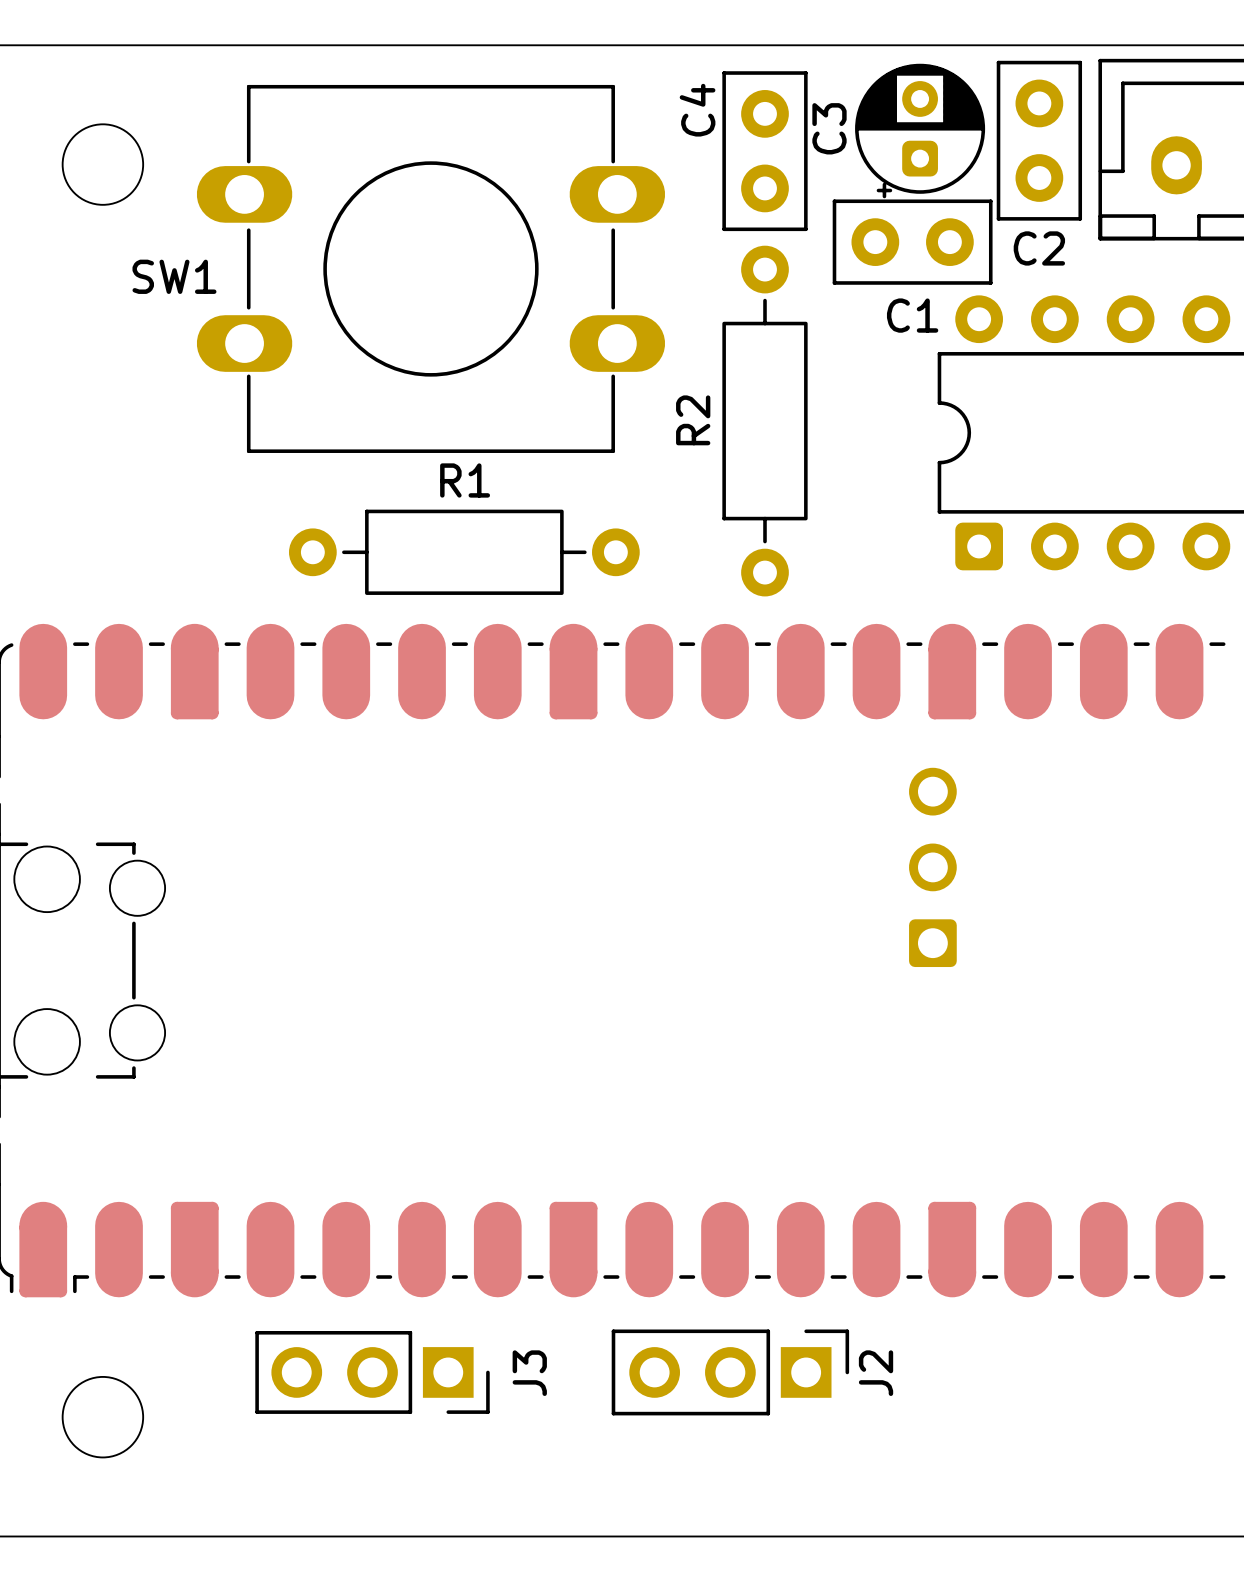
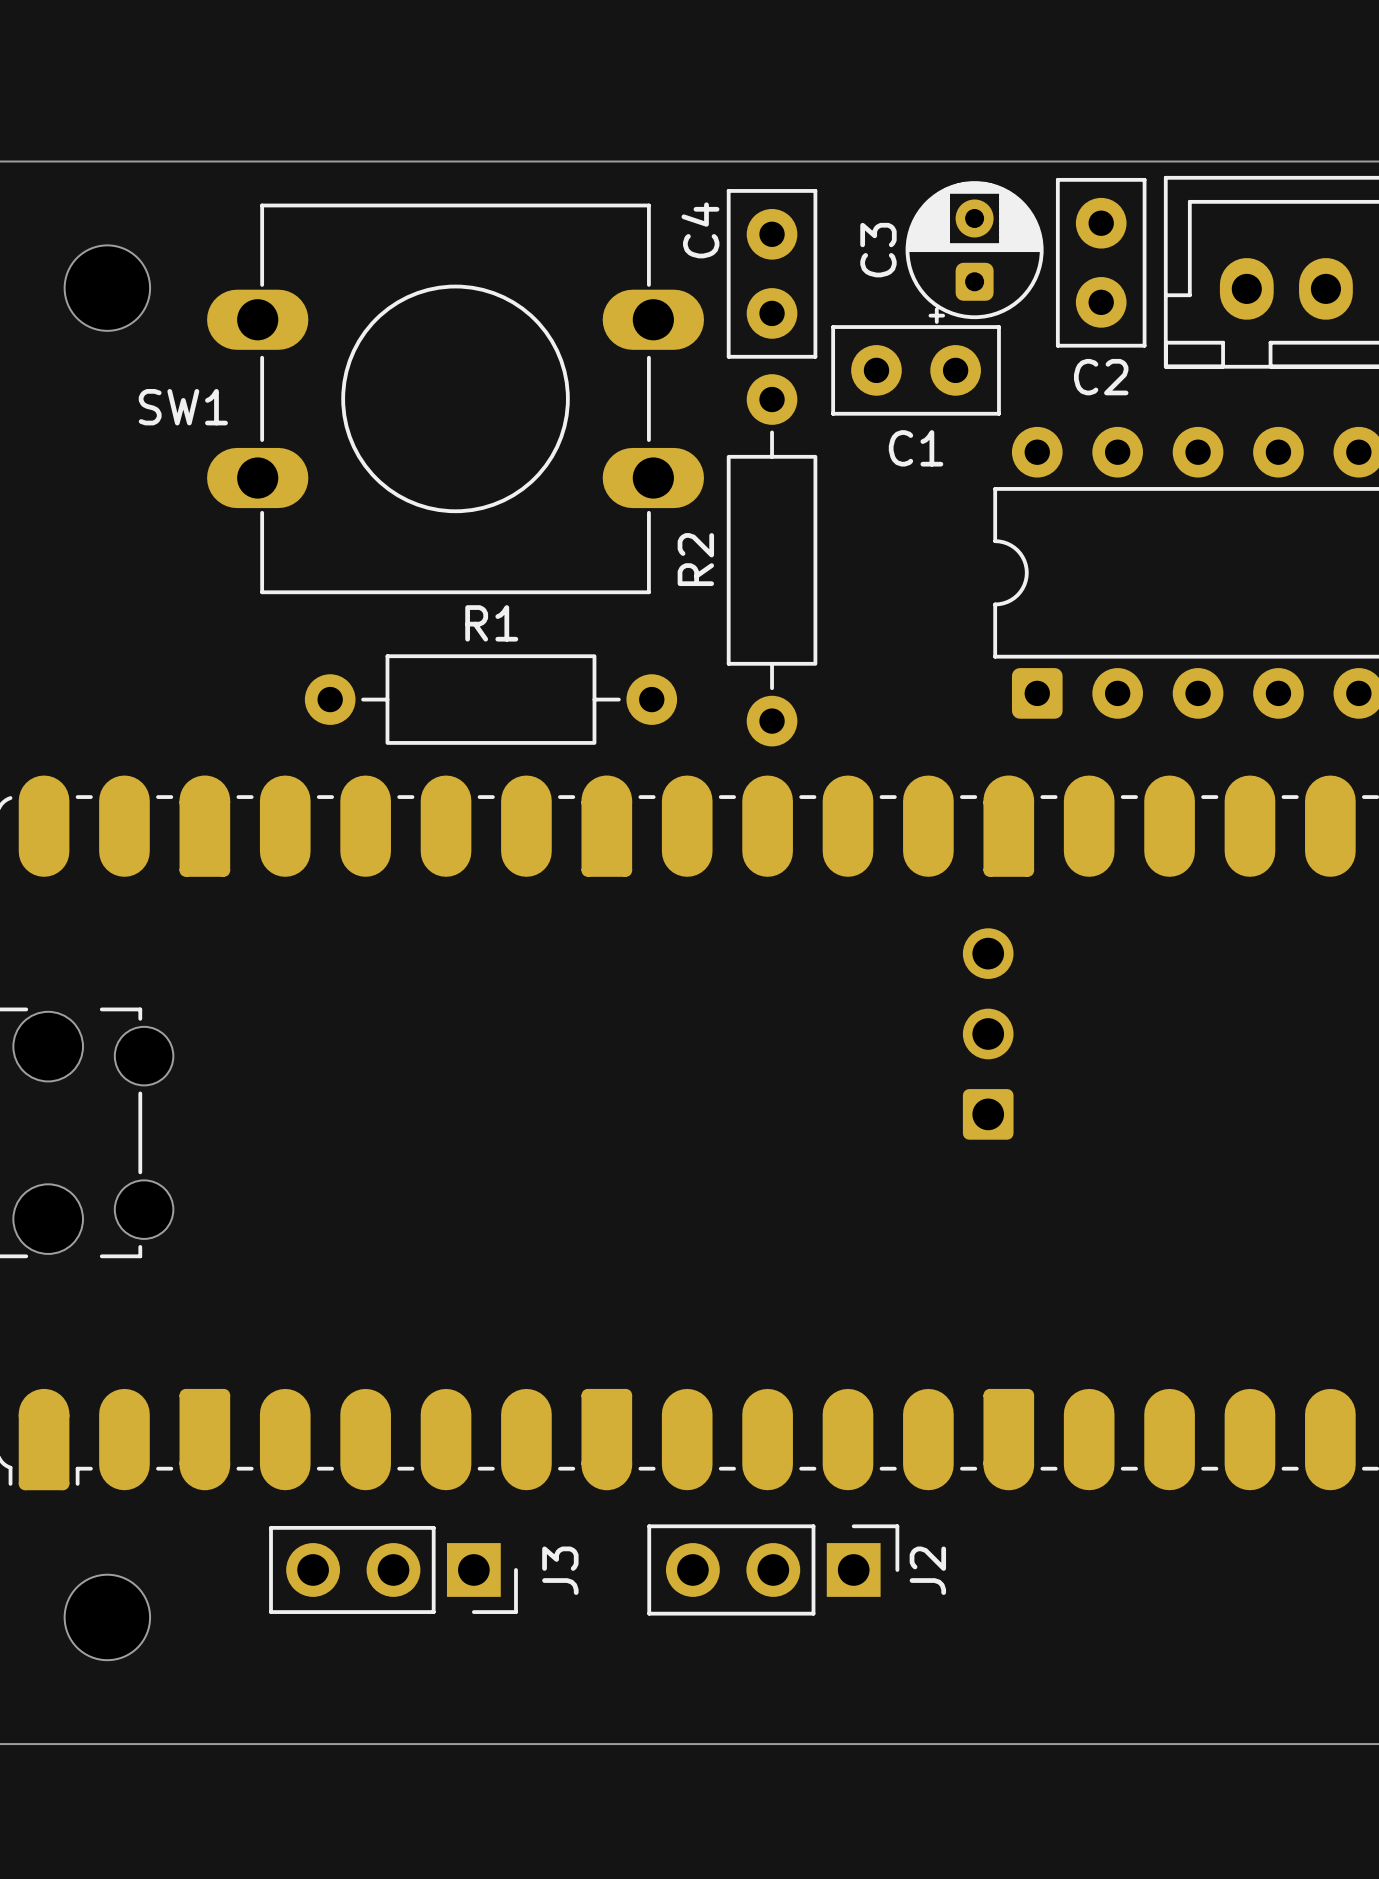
C4 position: (764, 151) -> (772, 273)
C1 position: (912, 242) -> (916, 370)
R2 position: (764, 421) -> (772, 560)

